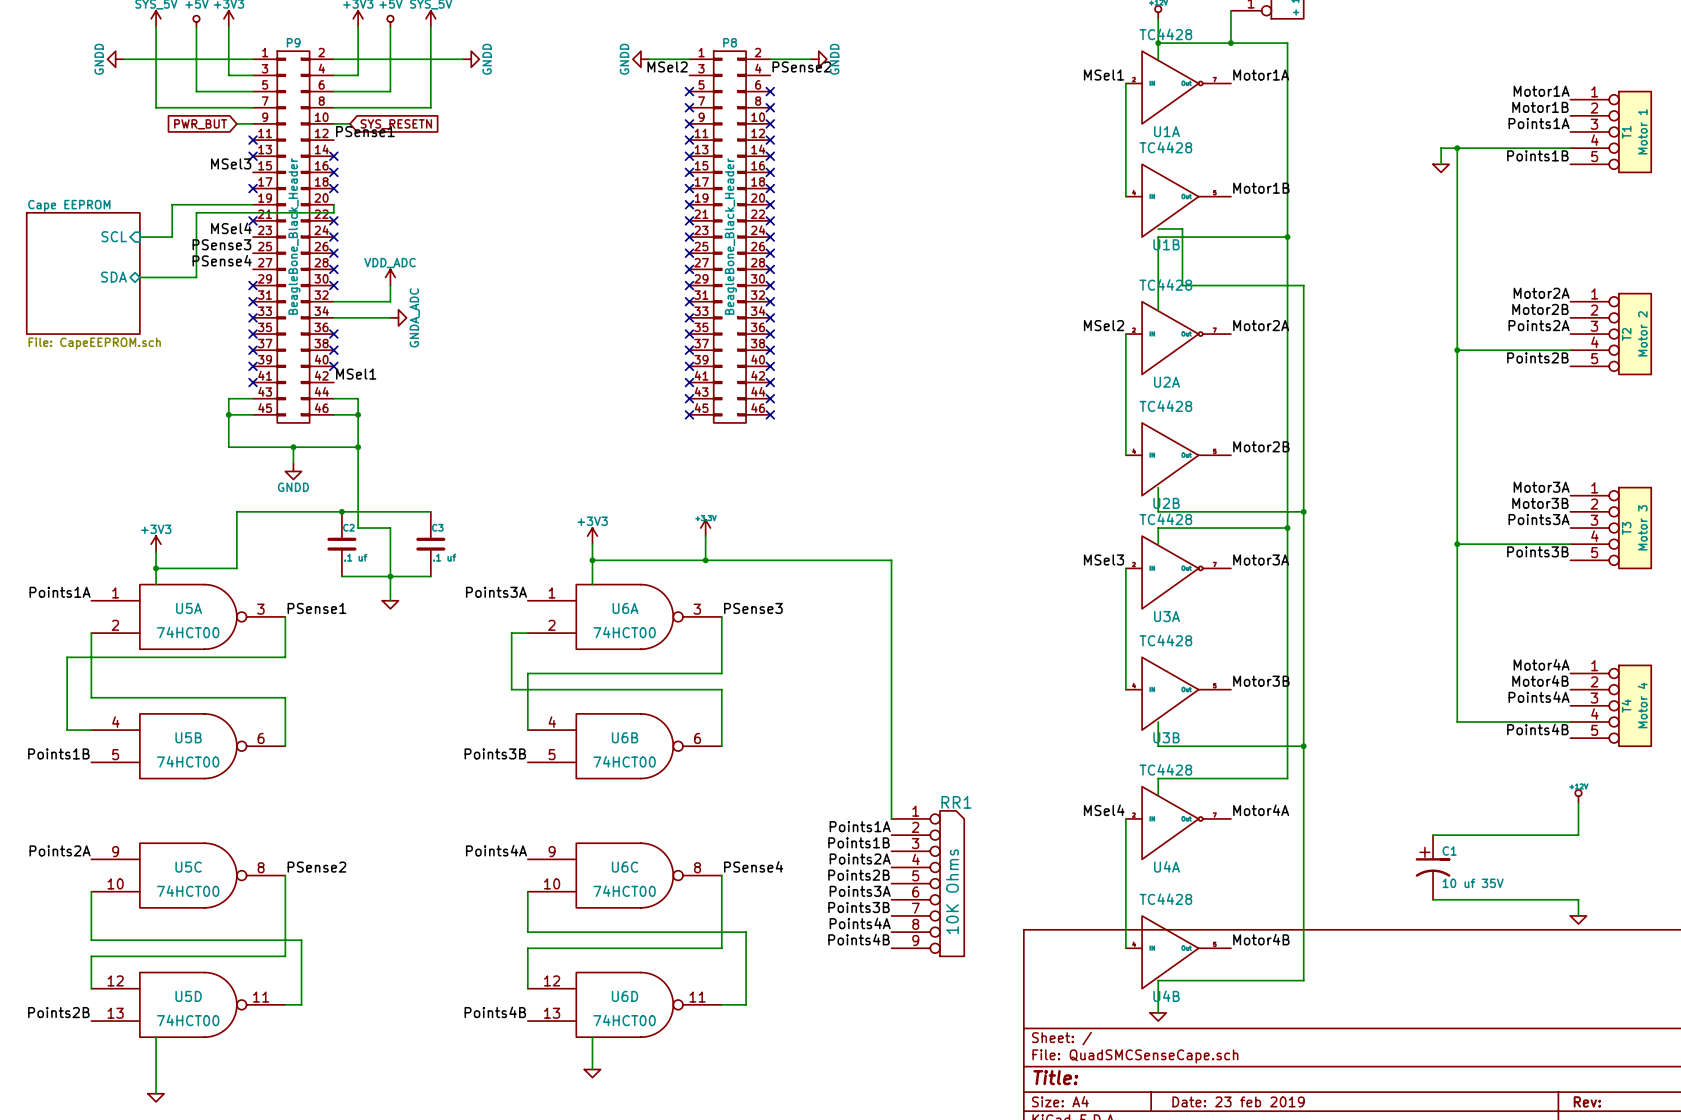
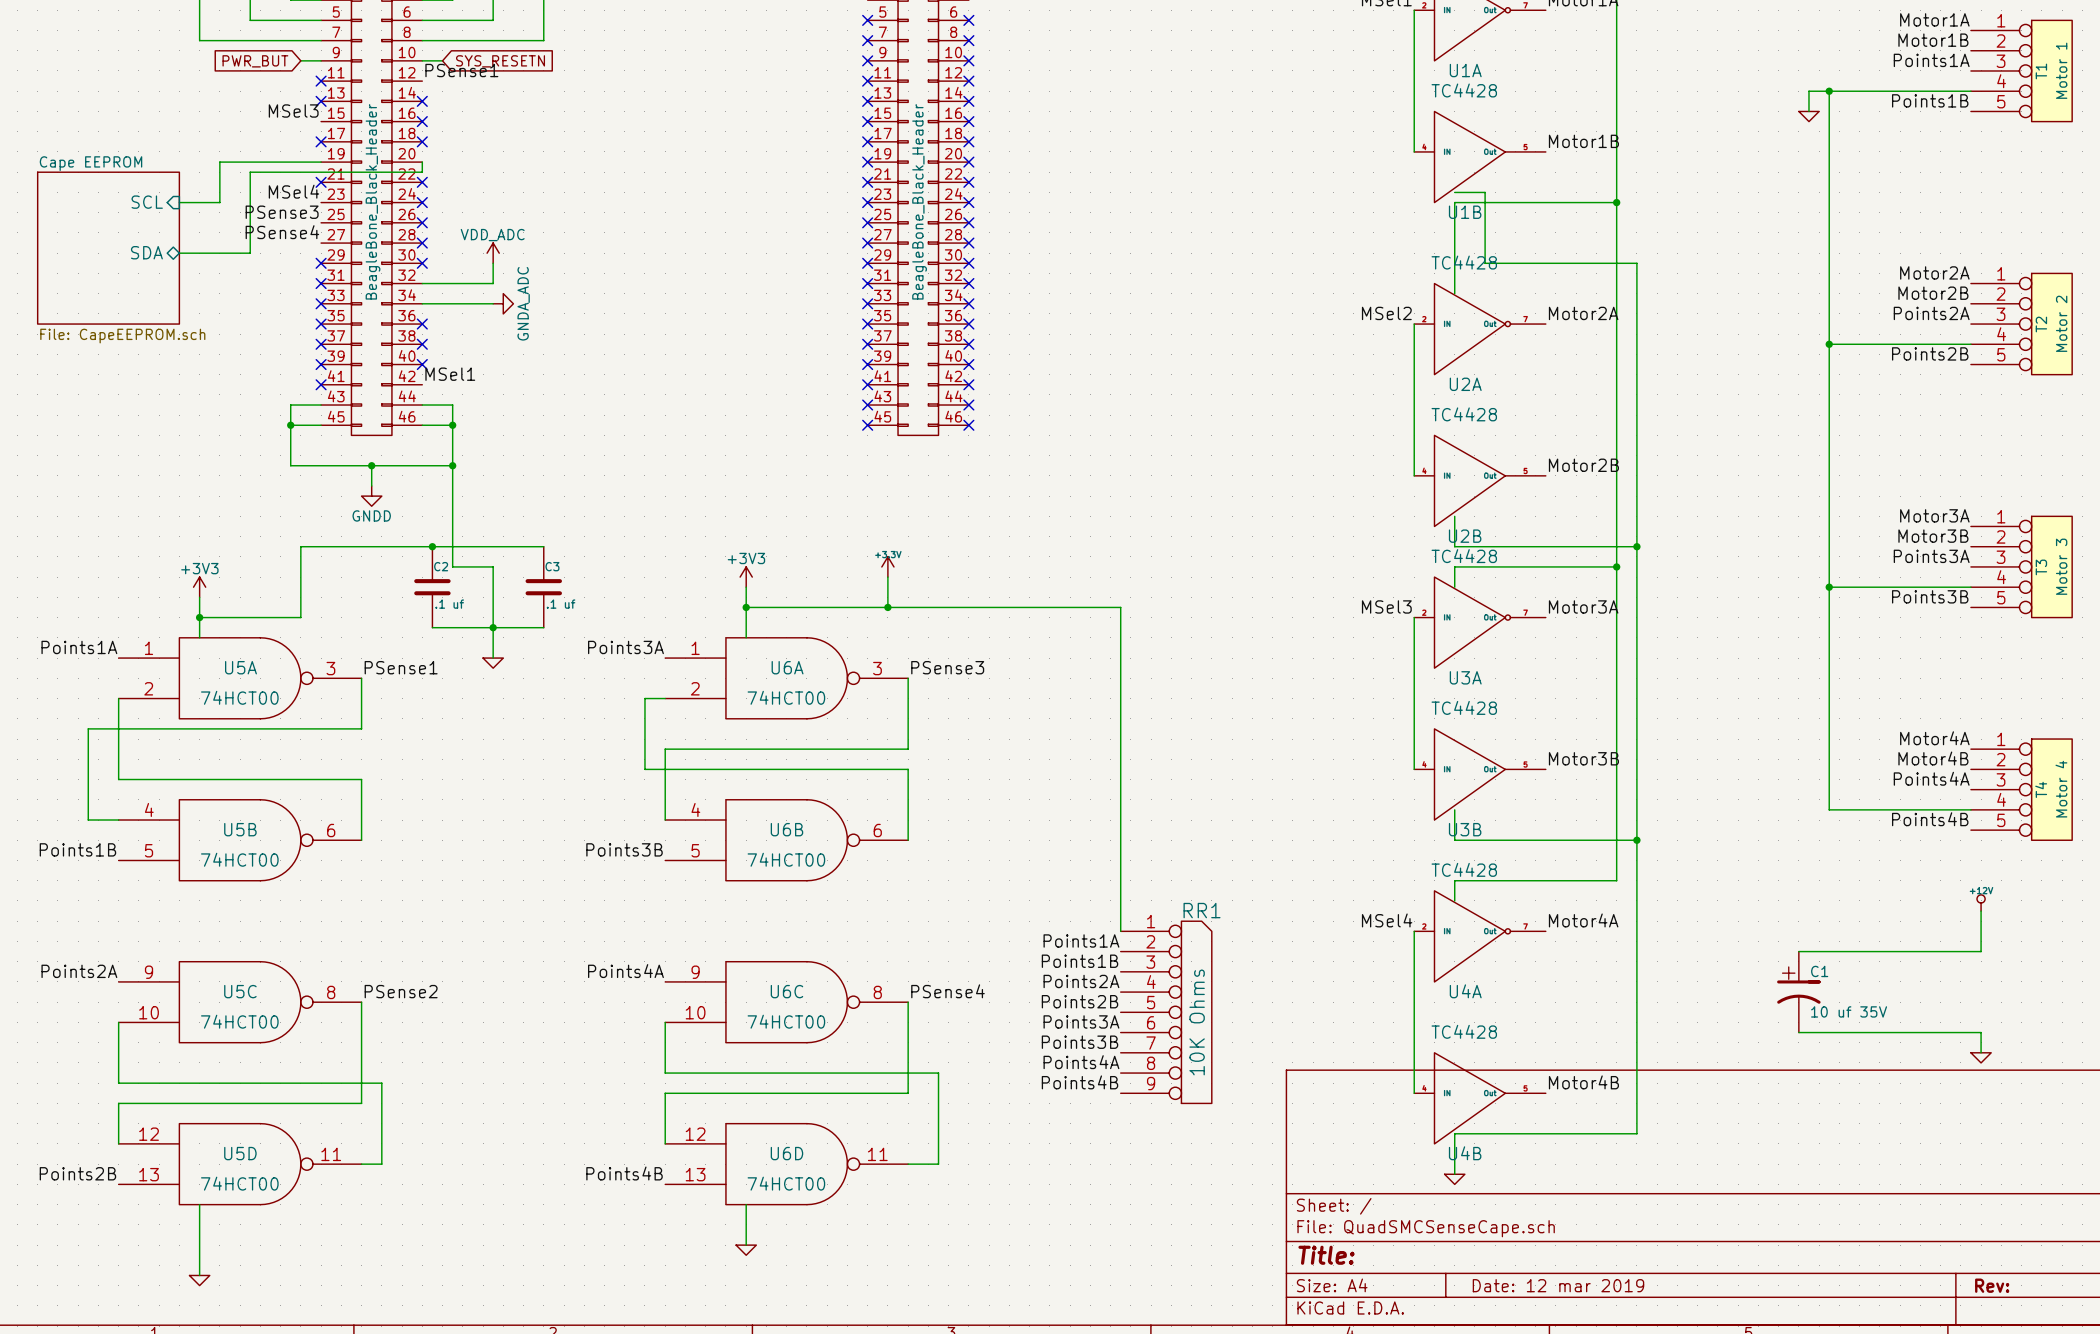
title block: Date: 23 feb 2019 (1238, 1101) -> Date: 12 mar 2019 (1558, 1285)

